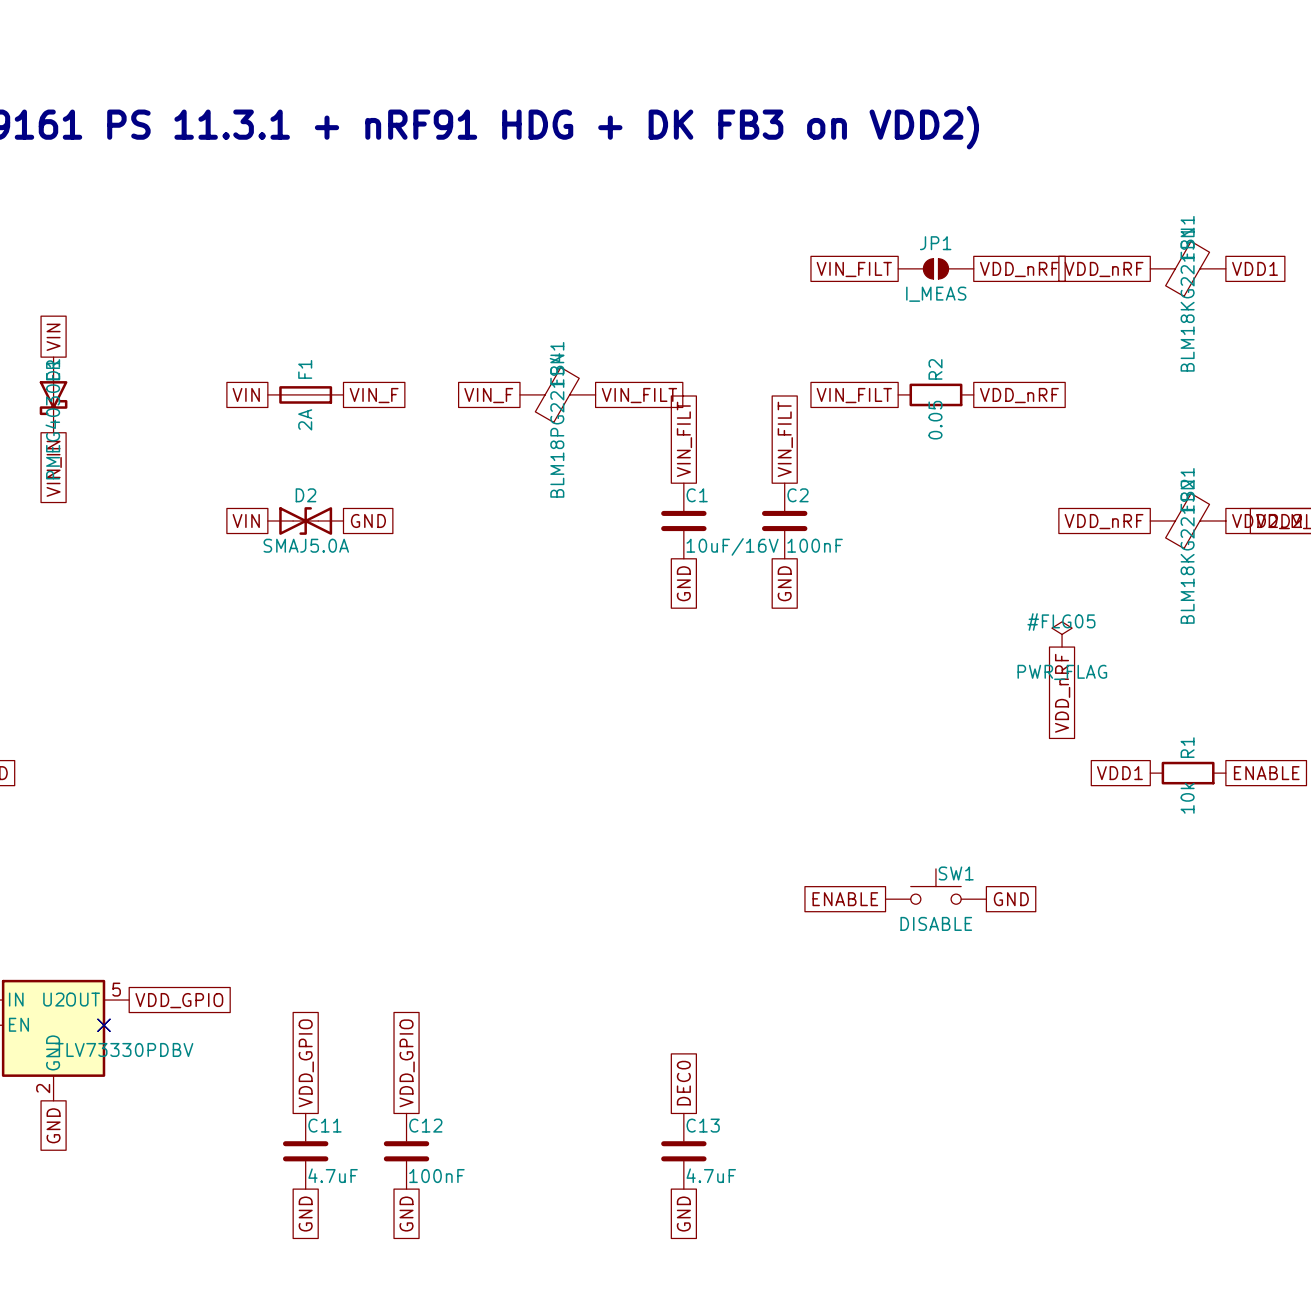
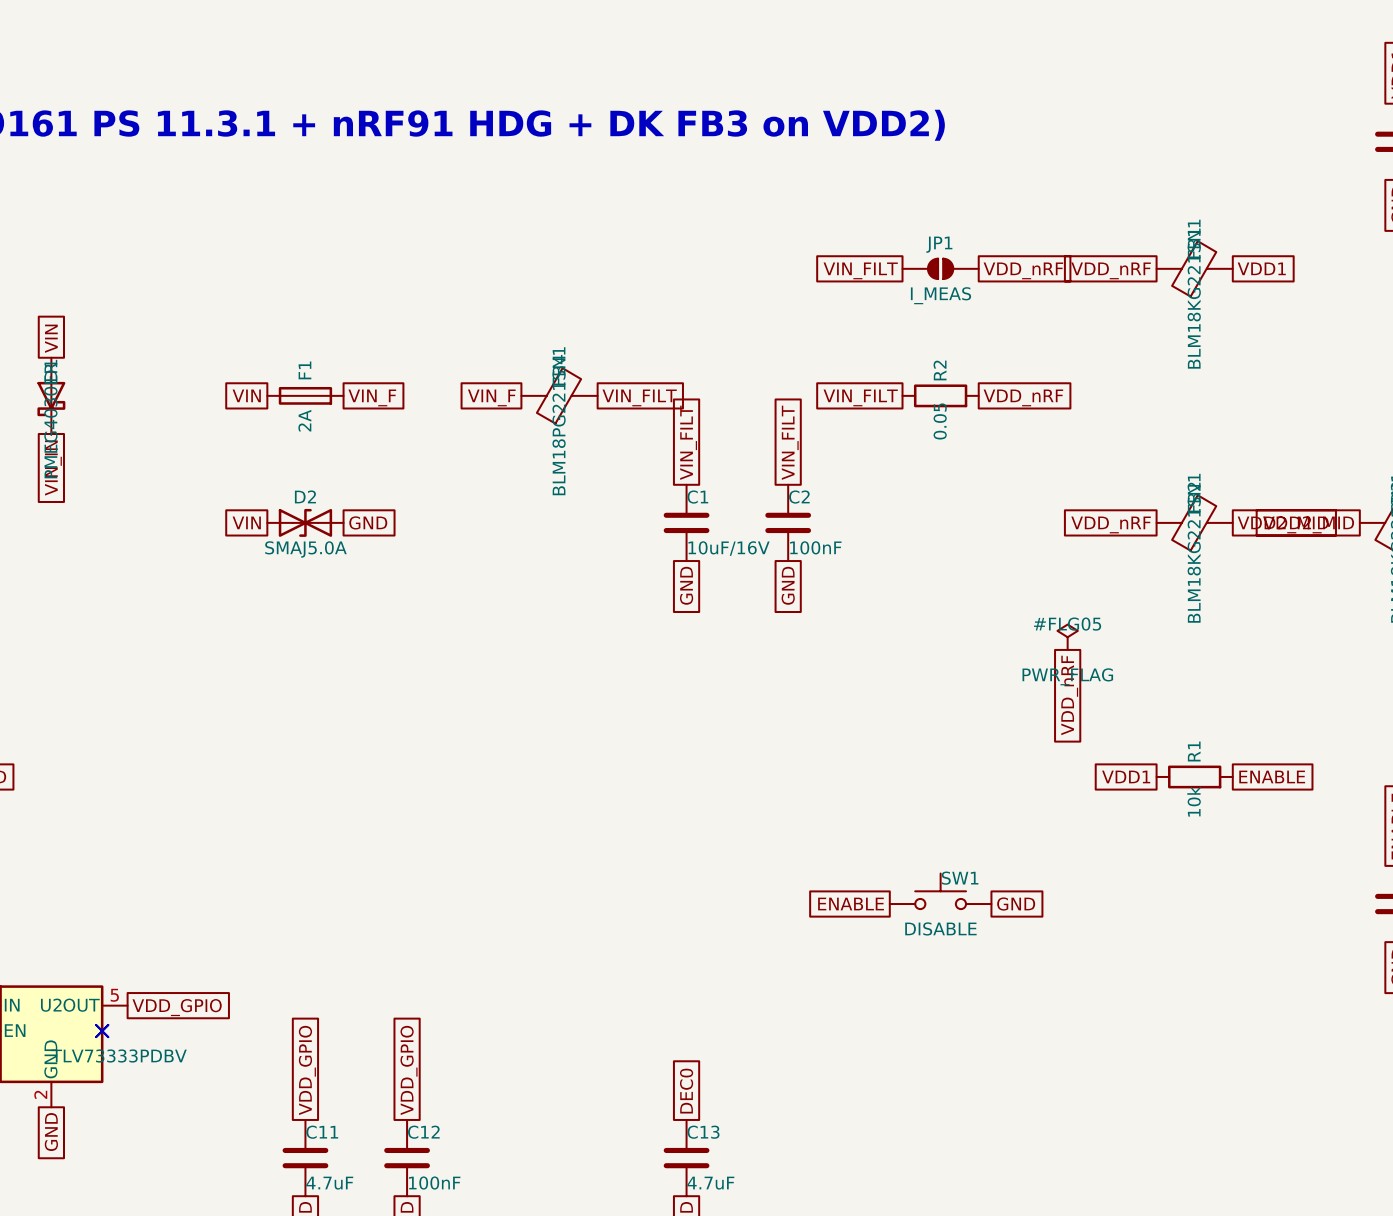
U2 value: TLV73330PDBV (124, 1049) -> TLV73333PDBV (119, 1055)

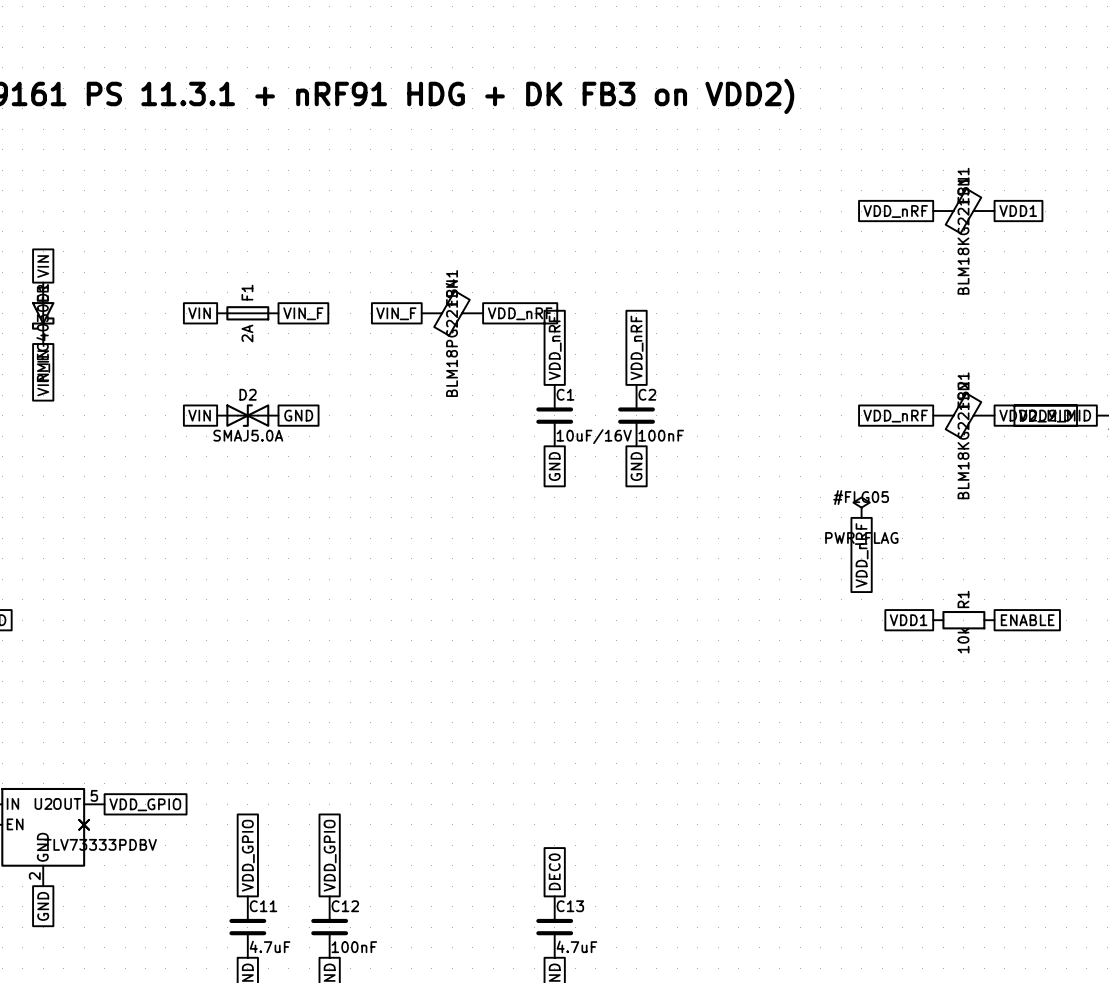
JP1: I_MEAS (940, 268) -> none
global label: VIN_FILT (860, 270) -> none
global label: VDD_nRF (1023, 270) -> none
R2: 0.05 (940, 395) -> none
global label: VIN_FILT (639, 397) -> VDD_nRF (520, 313)
global label: VIN_FILT (860, 397) -> none
global label: VDD_nRF (1023, 397) -> none
global label: VIN_FILT (688, 442) -> VDD_nRF (555, 347)
global label: VIN_FILT (790, 442) -> VDD_nRF (637, 347)
SW1: DISABLE (940, 891) -> none
global label: ENABLE (851, 904) -> none
global label: GND (1016, 904) -> none

